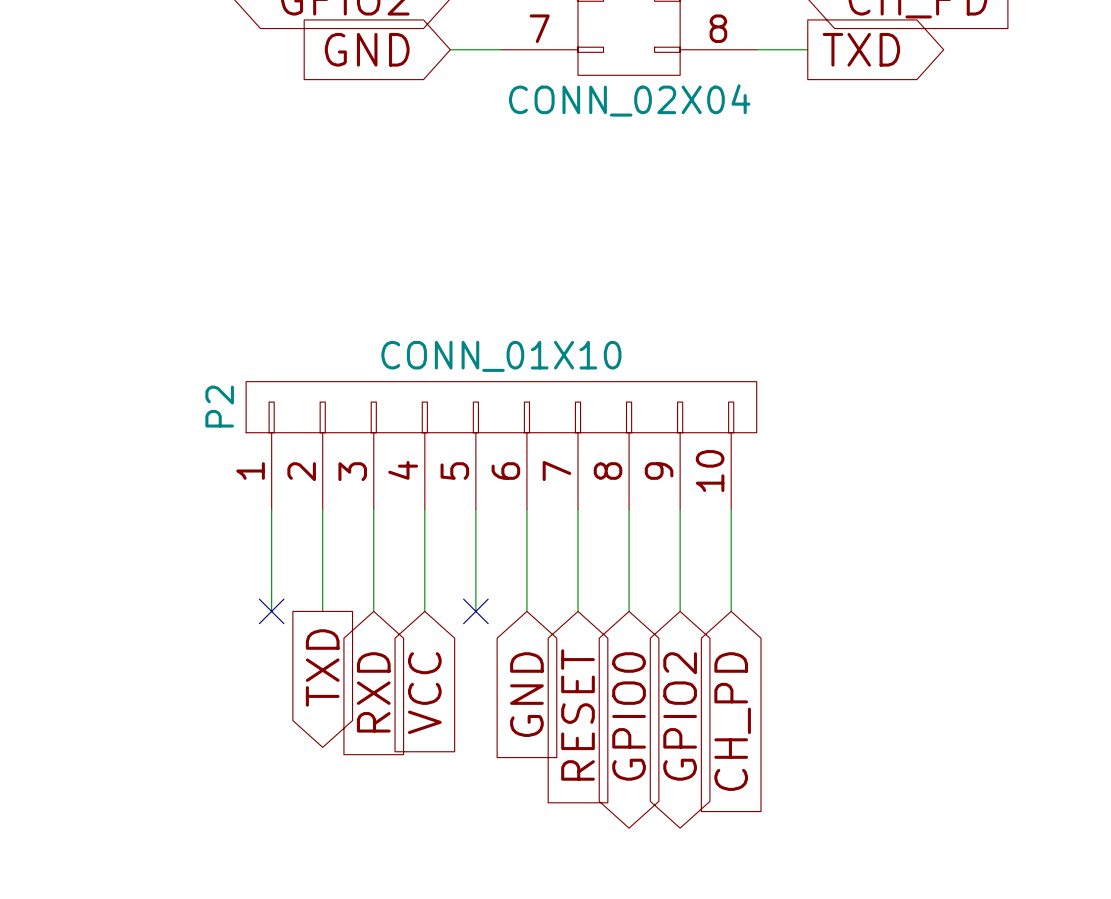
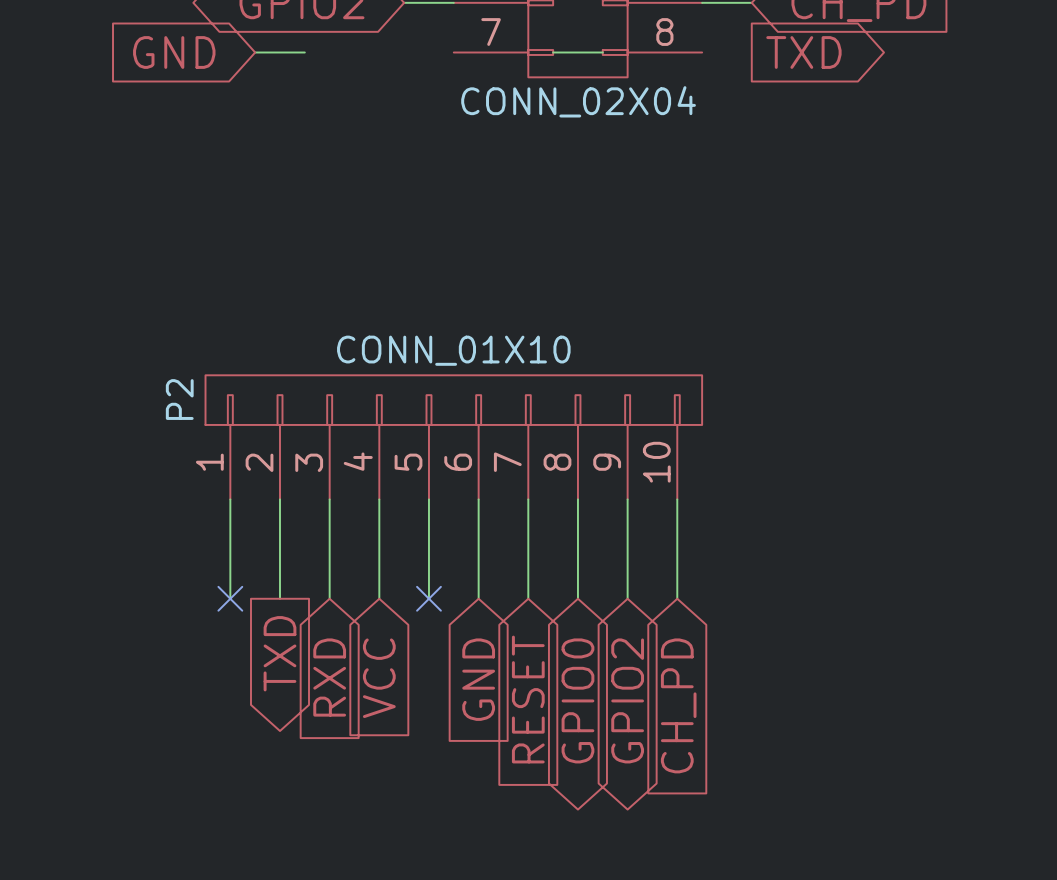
global label position: GND (367, 49) -> GND (174, 52)
wire: (450, 49) (501, 49) -> (255, 52) (304, 52)
wire: (756, 49) (807, 49) -> (553, 52) (602, 52)

